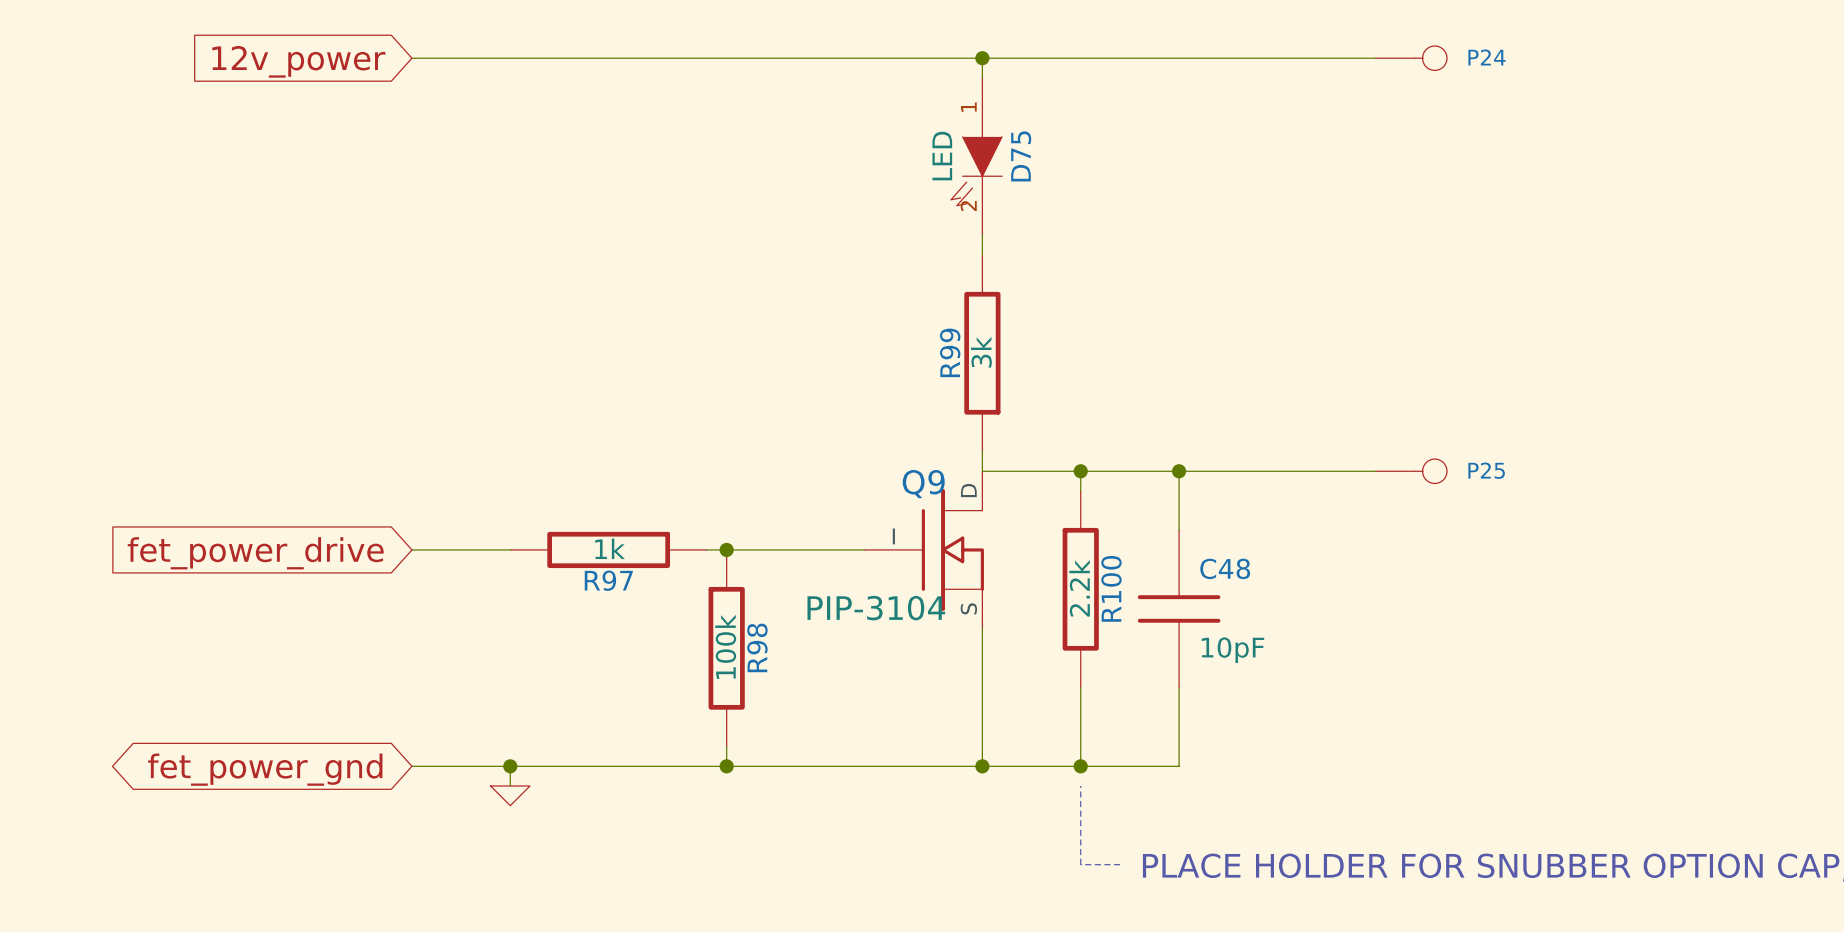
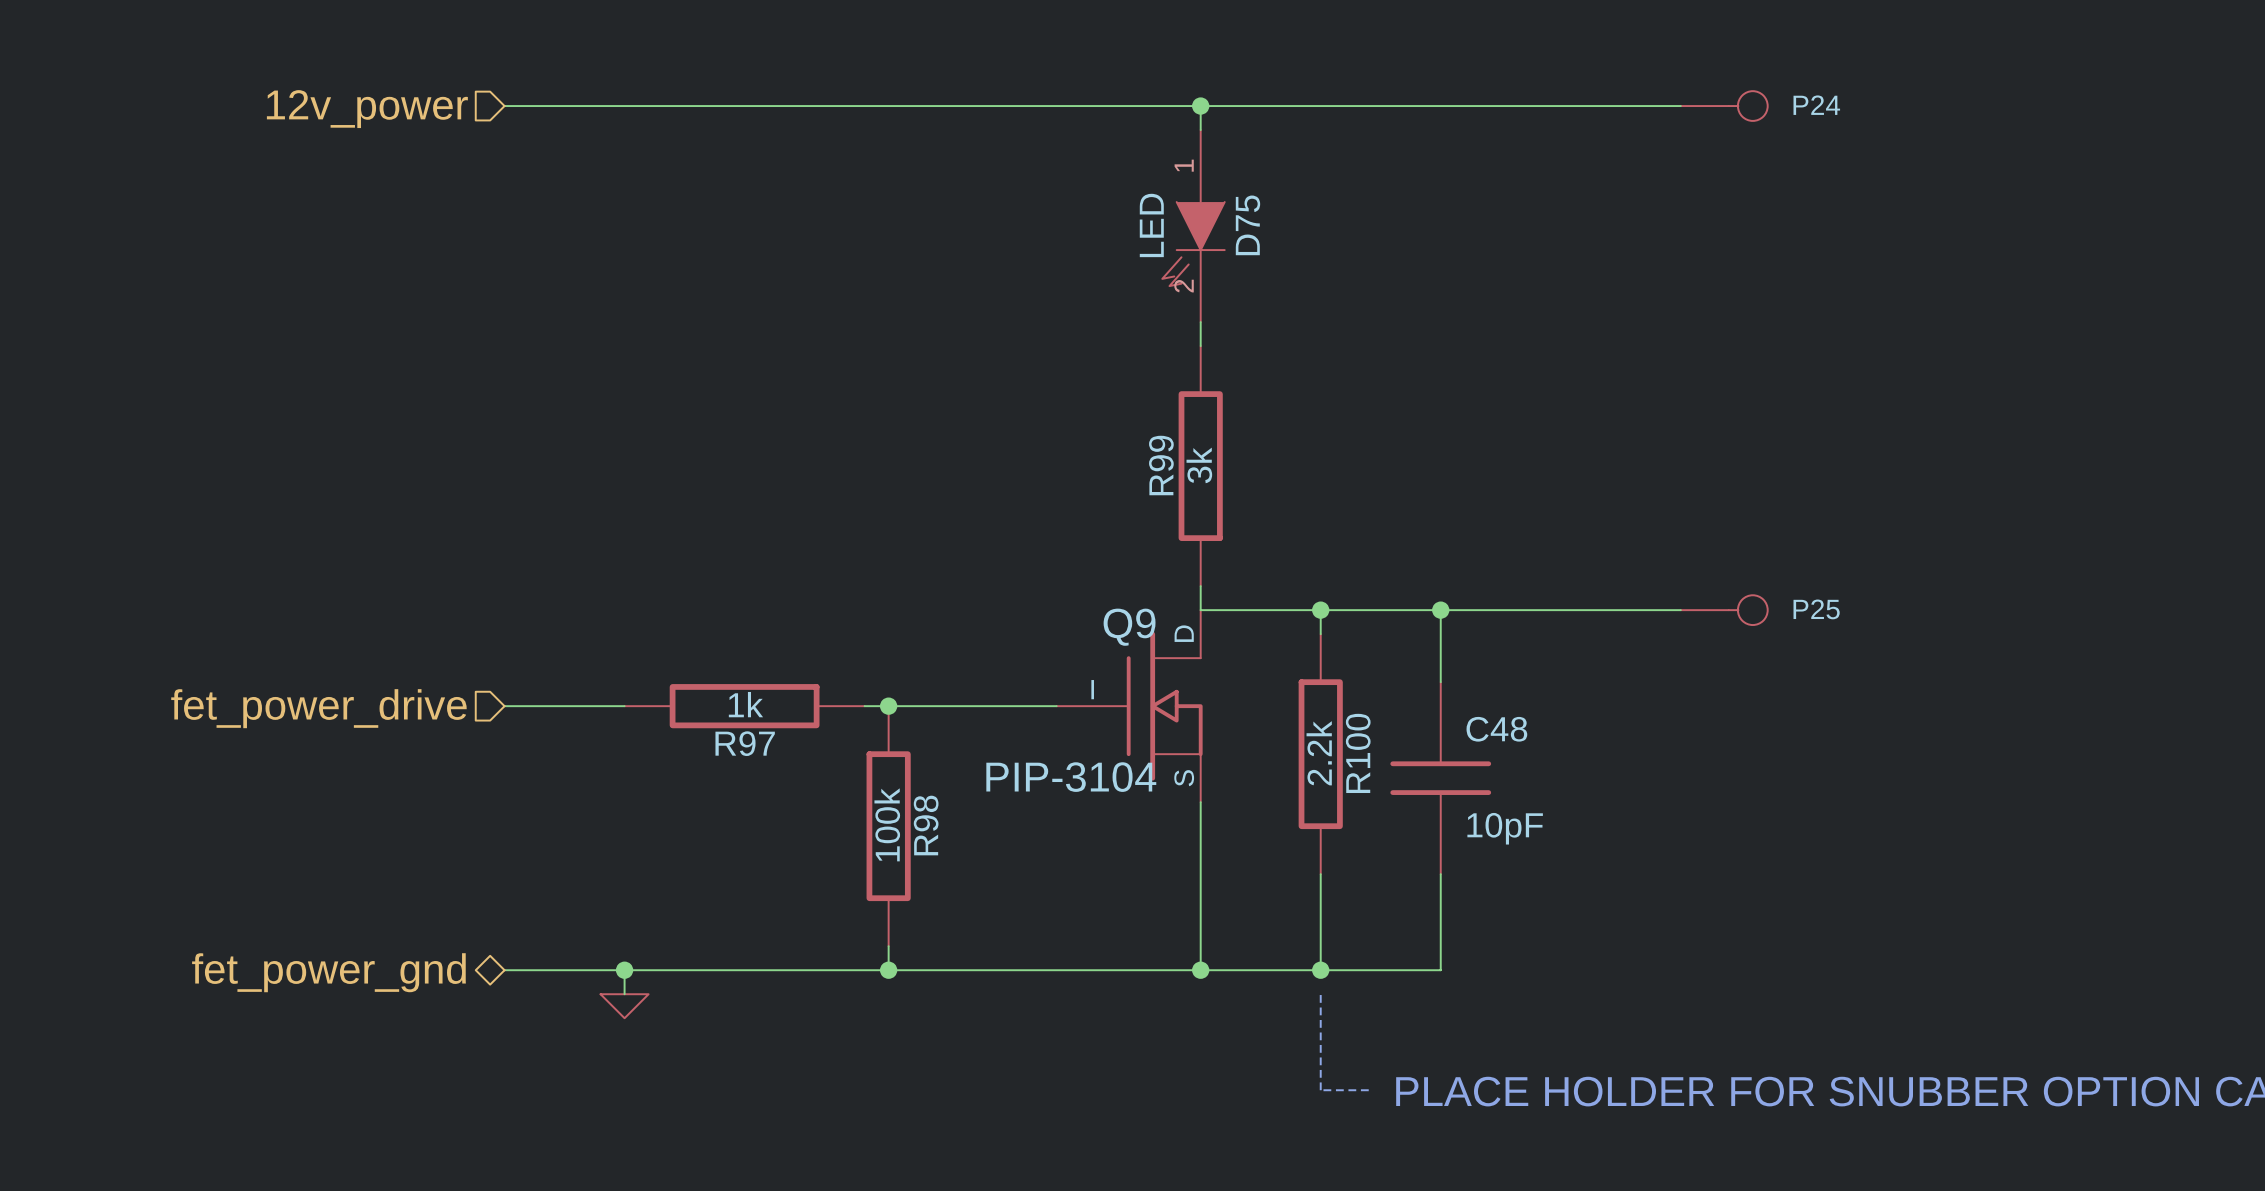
hierarchical label: none -> 12v_power (367, 109)
global label: 12v_power (298, 61) -> none
hierarchical label: none -> fet_power_drive (318, 708)
global label: fet_power_drive (255, 553) -> none
hierarchical label: none -> fet_power_gnd (328, 972)
global label: fet_power_gnd (265, 769) -> none

